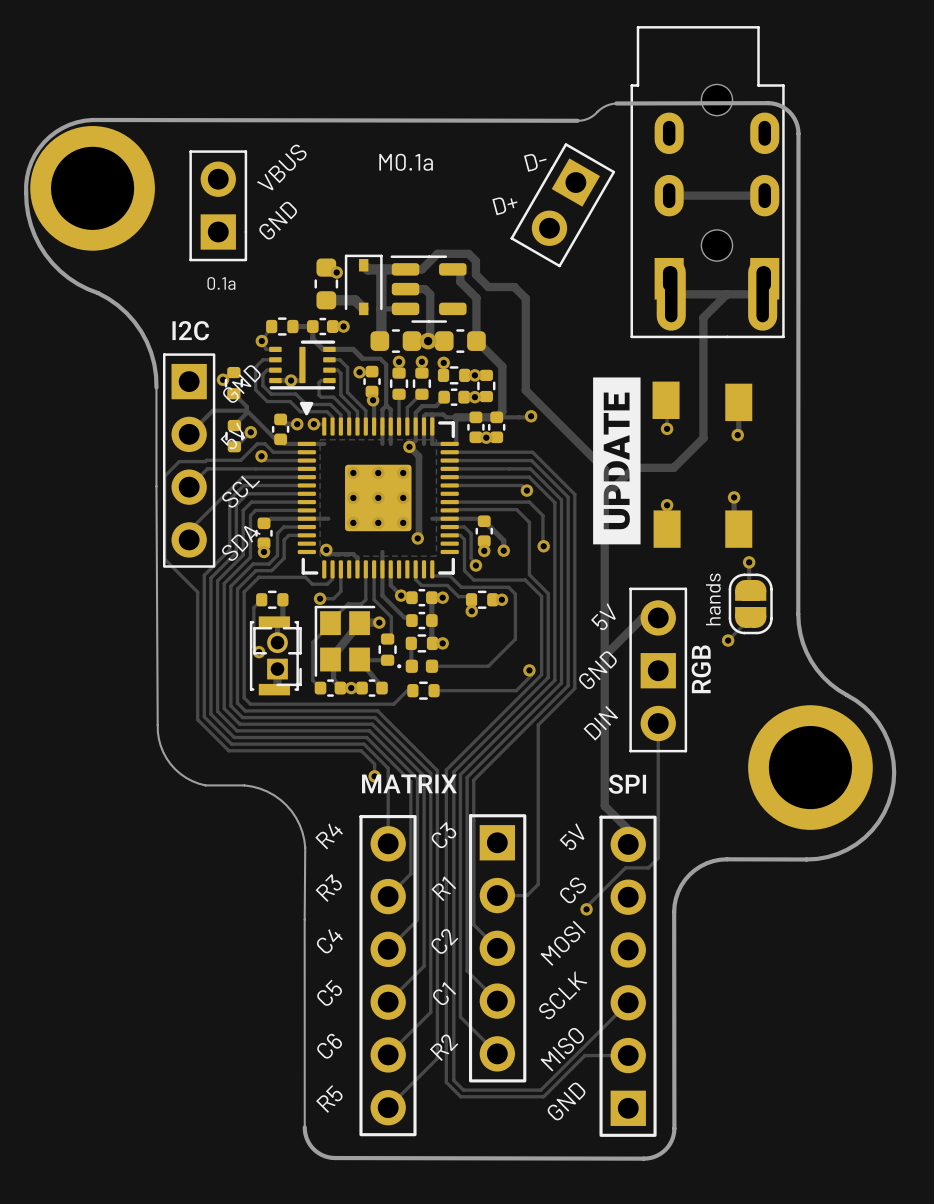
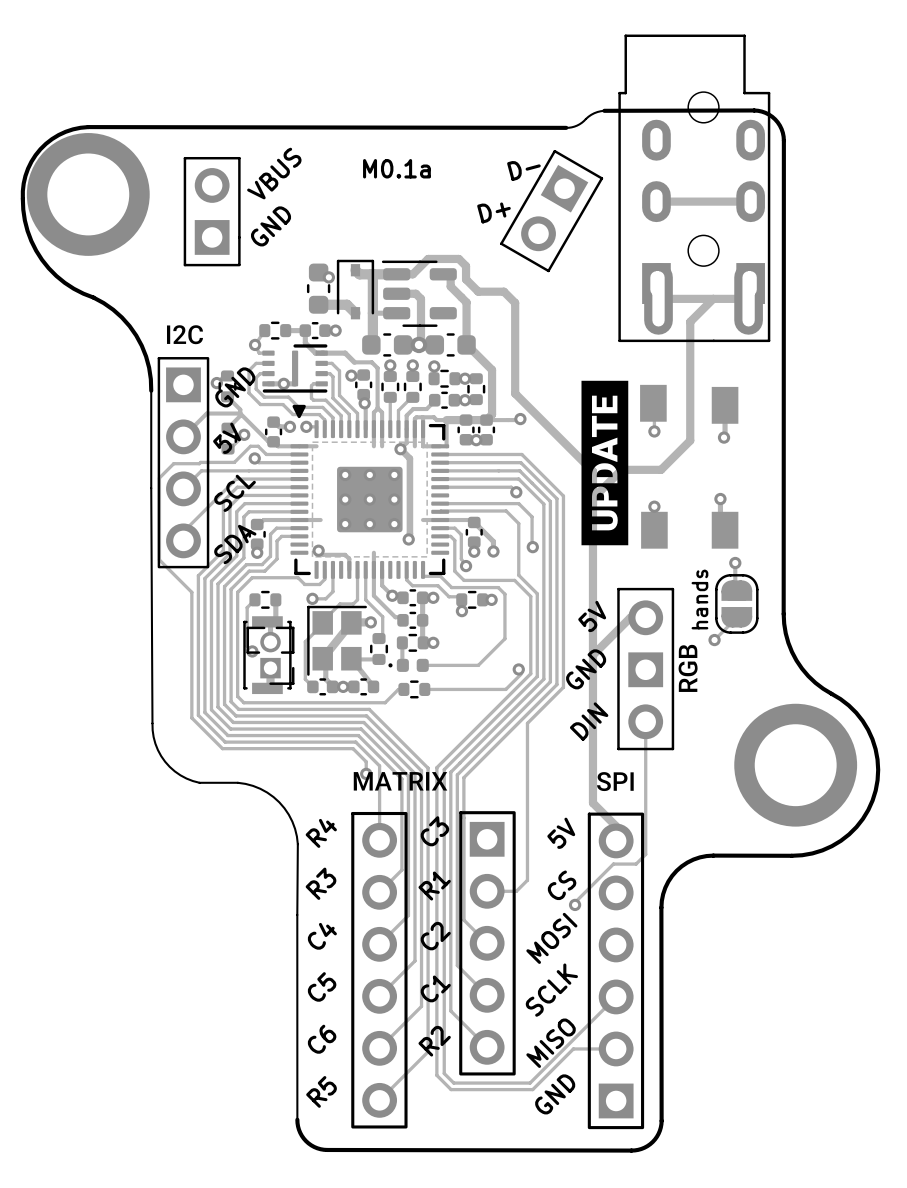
text: 0.1a (221, 283) -> none

